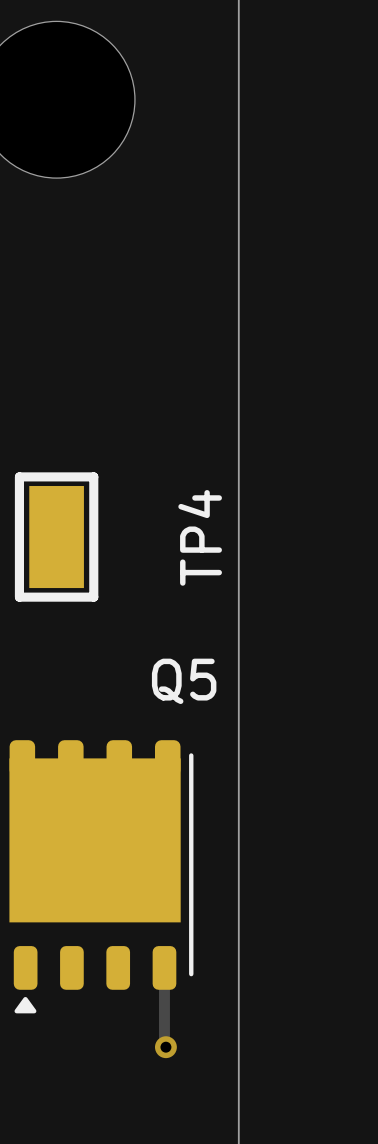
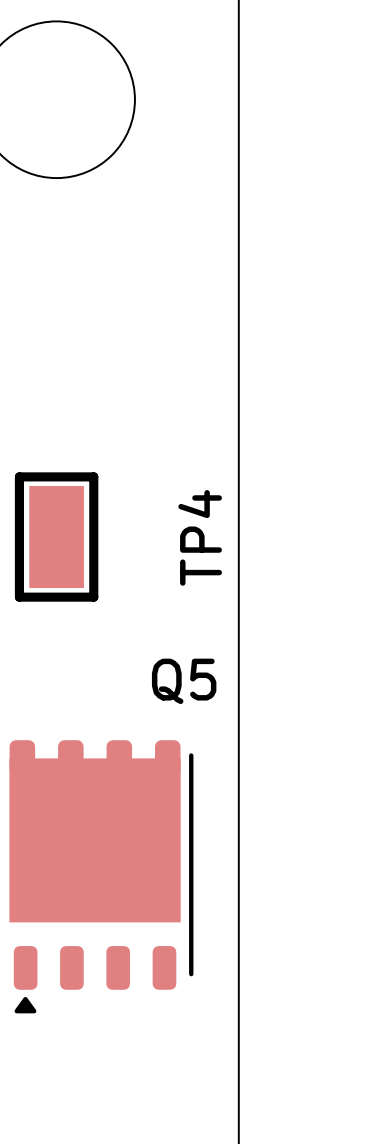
track: (164, 967) (165, 1047) -> none
via: (165, 1047) -> none

